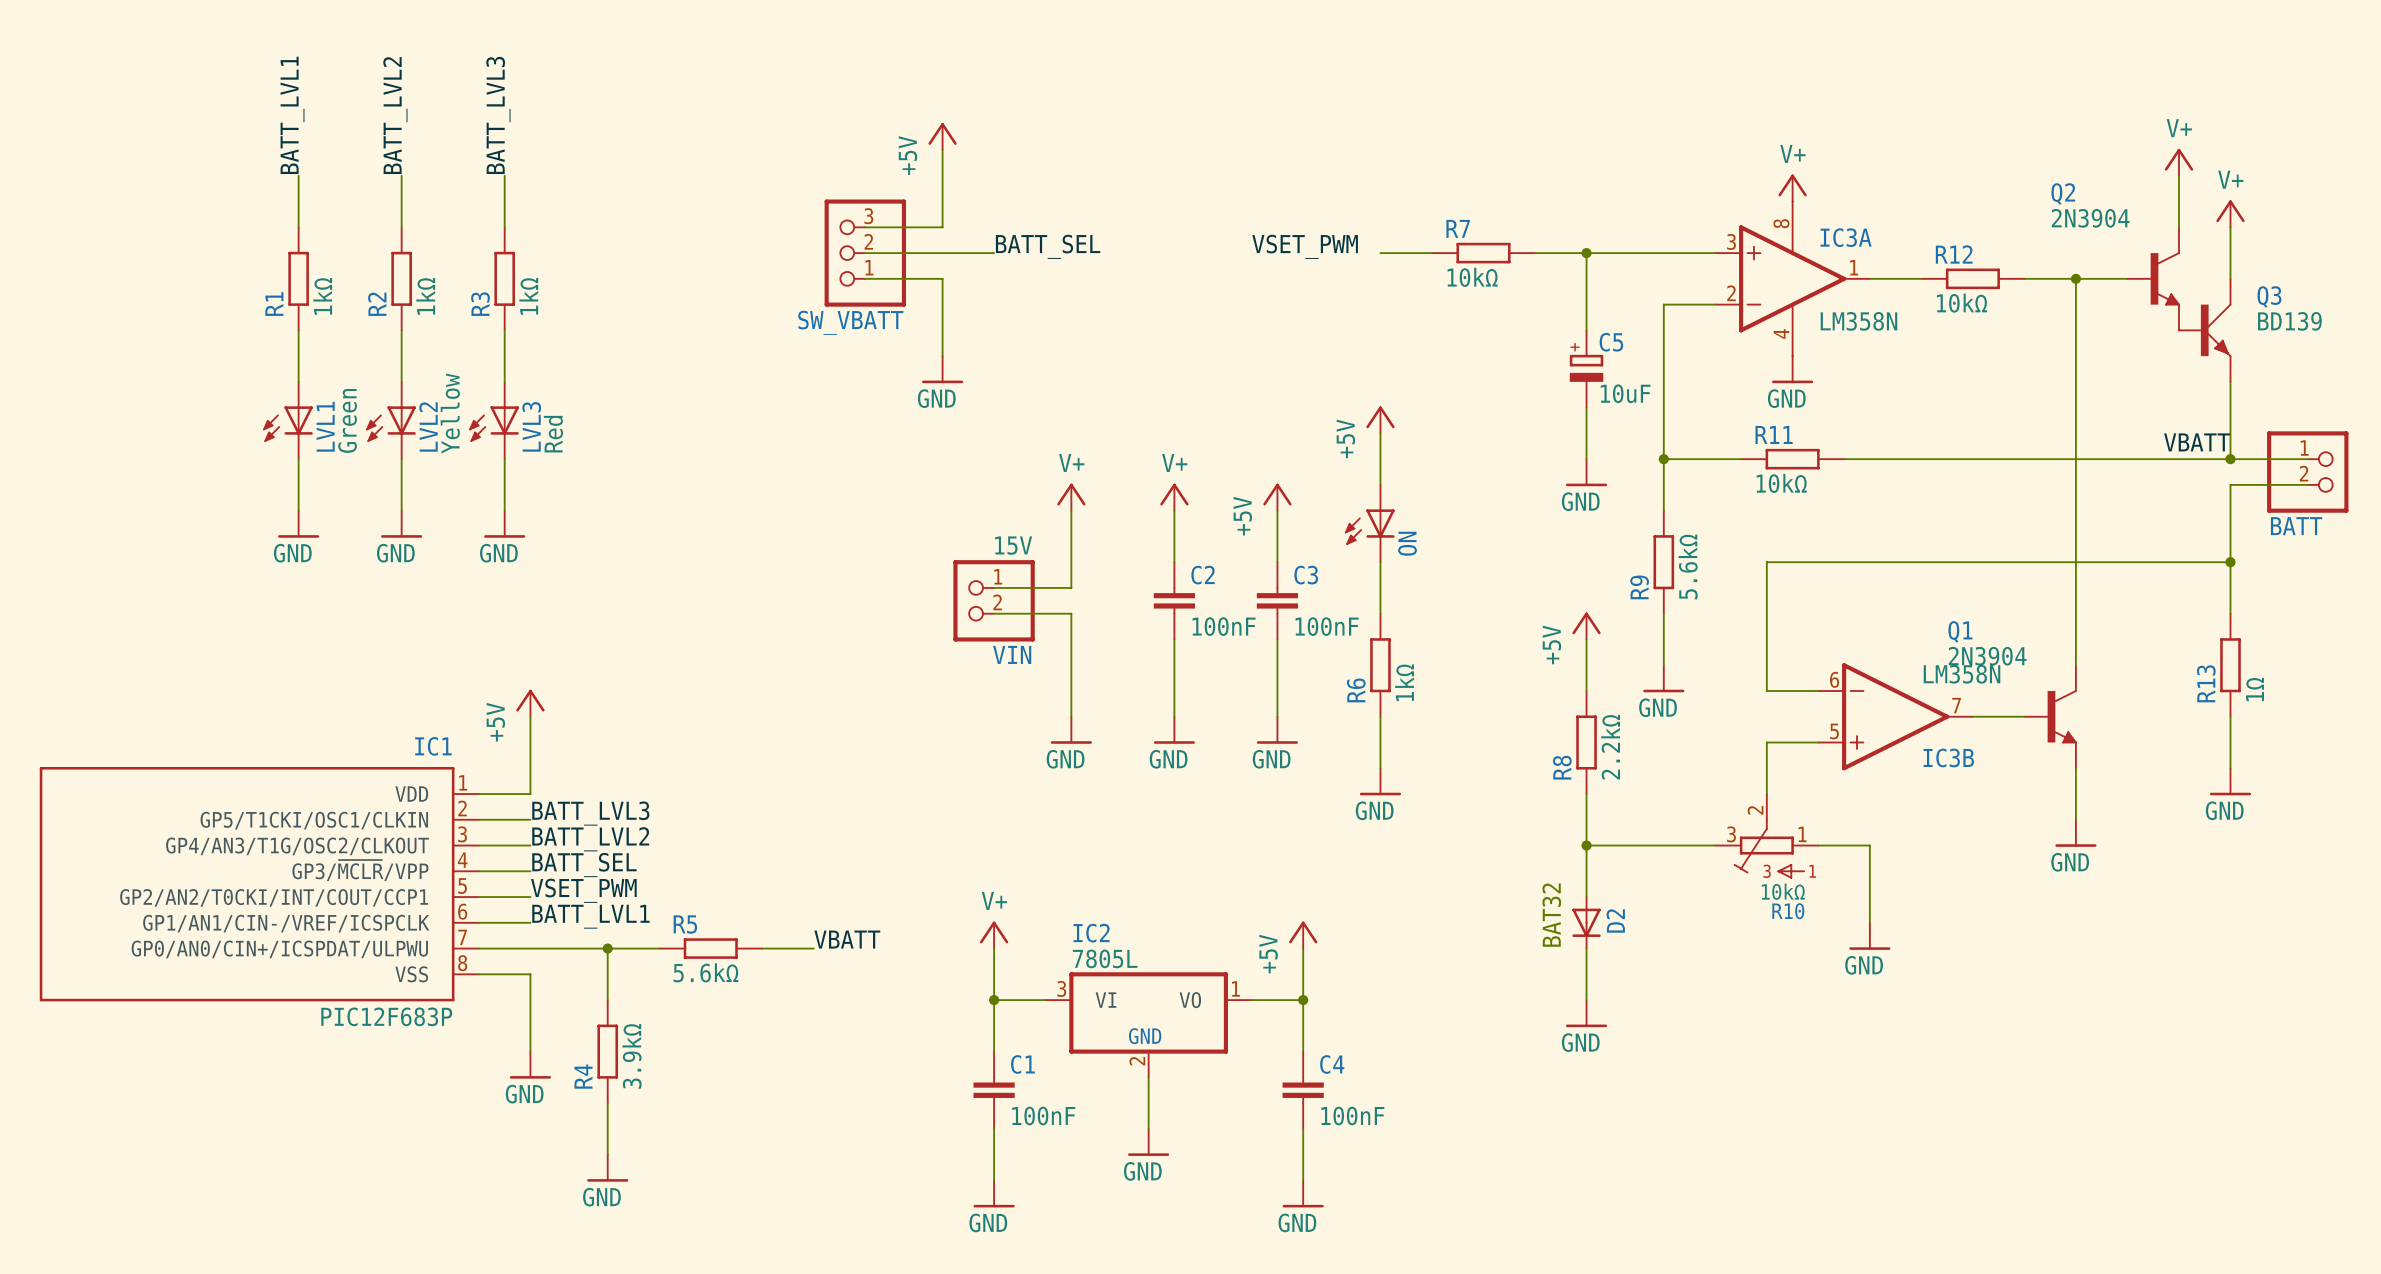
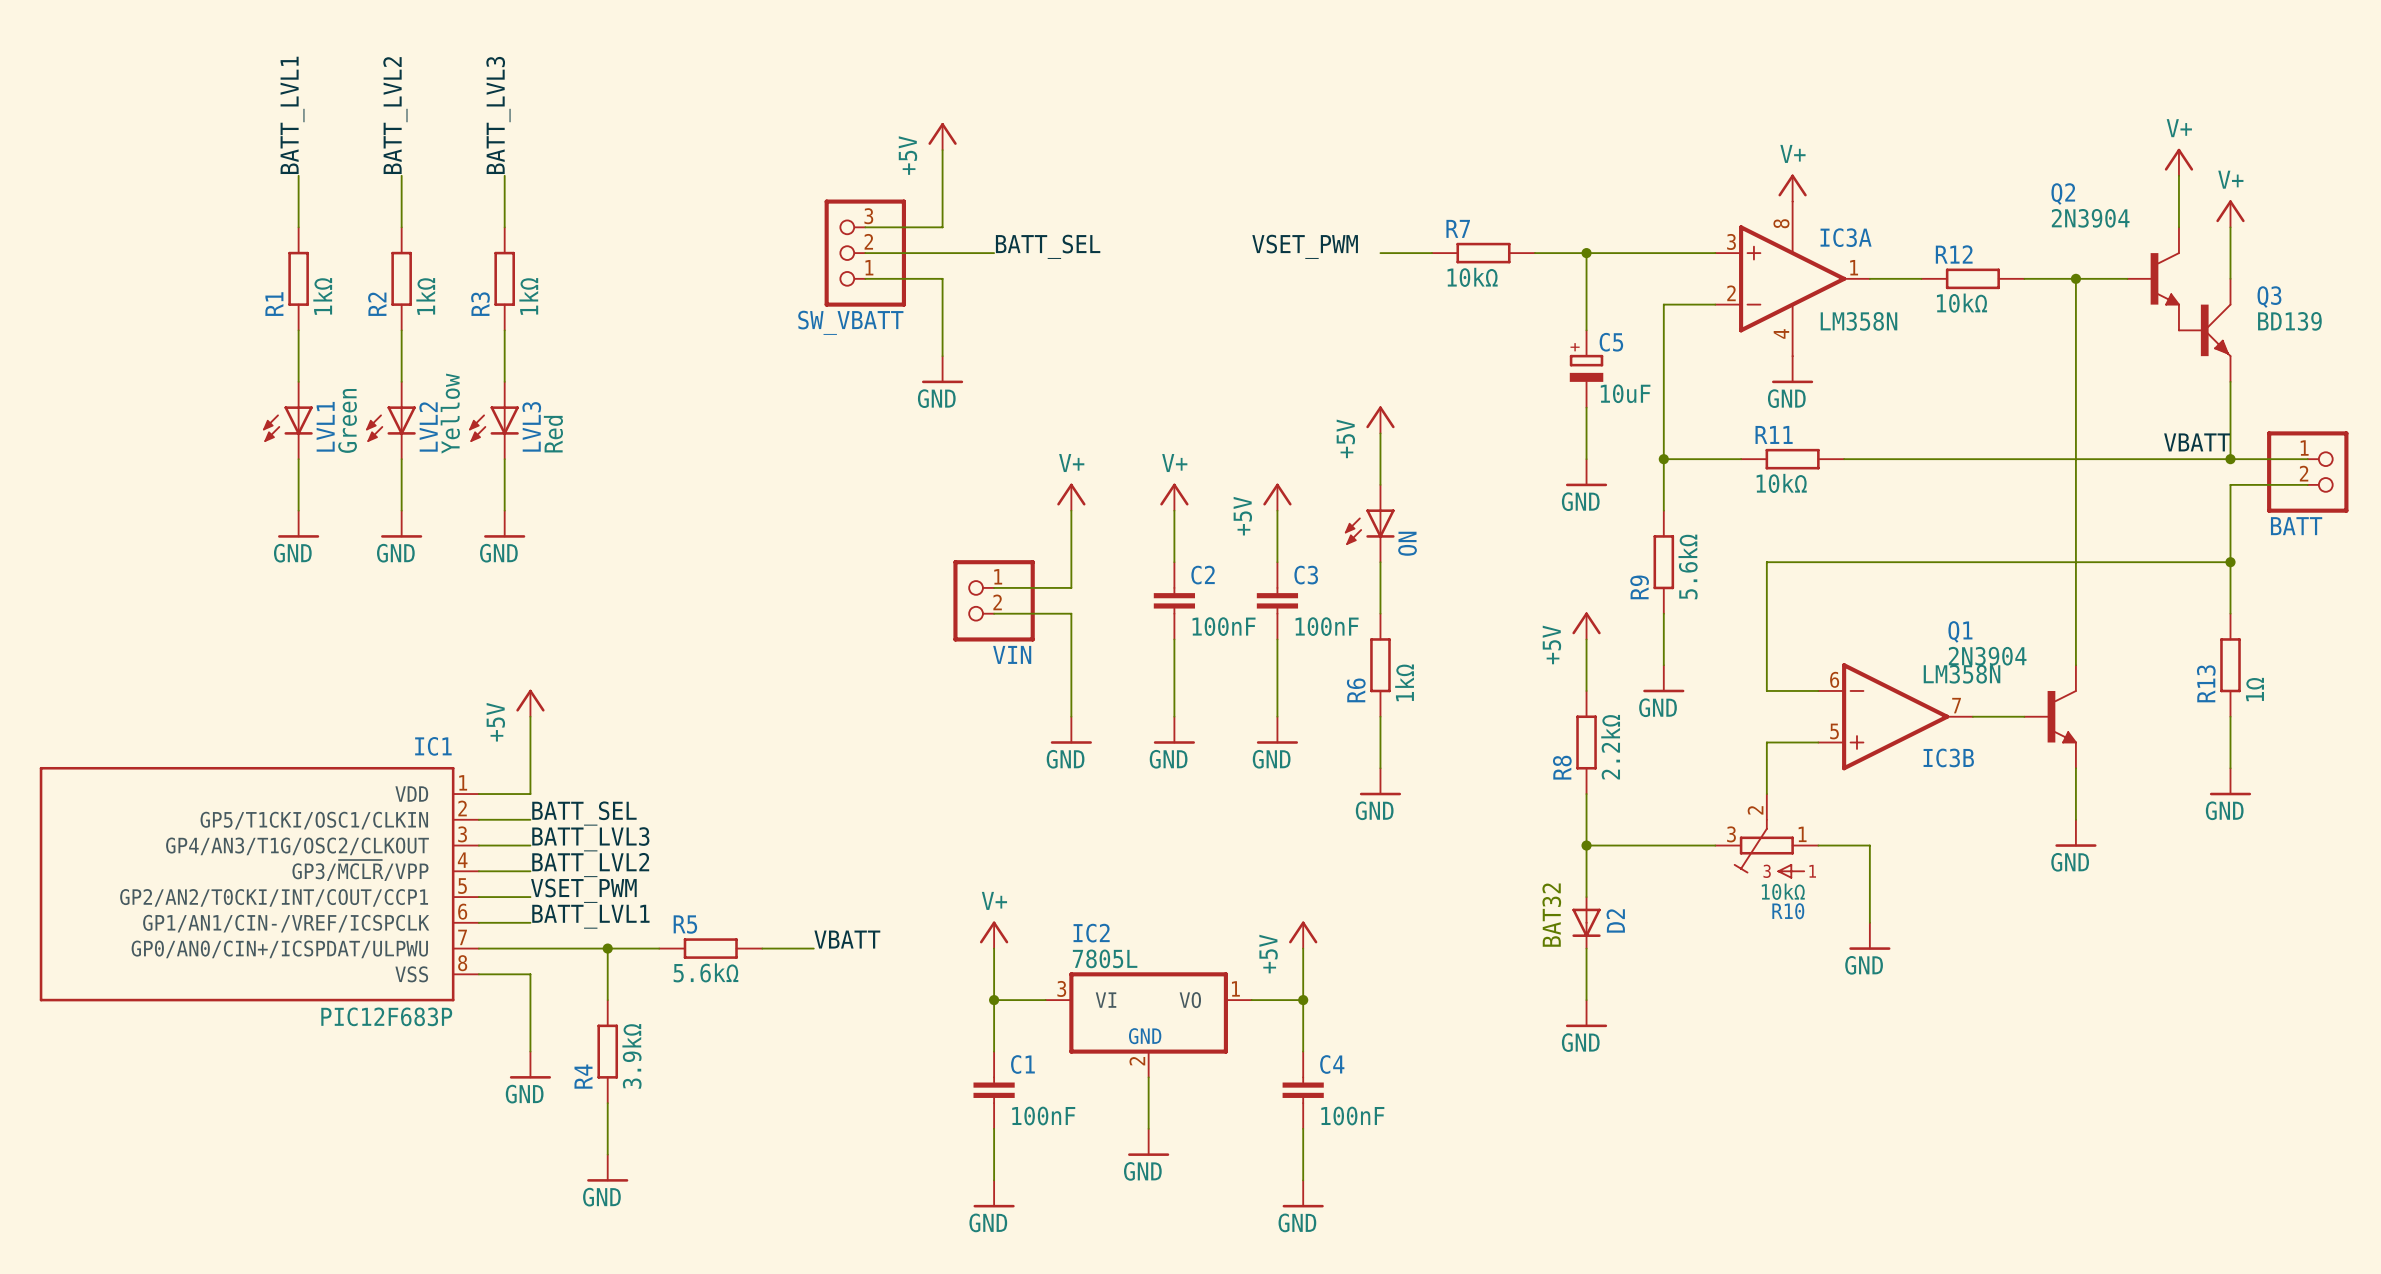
VIN value: 15V (1013, 545) -> none
label: BATT_LVL3 (590, 813) -> BATT_SEL (584, 813)
label: BATT_LVL2 (590, 839) -> BATT_LVL3 (590, 839)
label: BATT_SEL (584, 865) -> BATT_LVL2 (590, 865)

